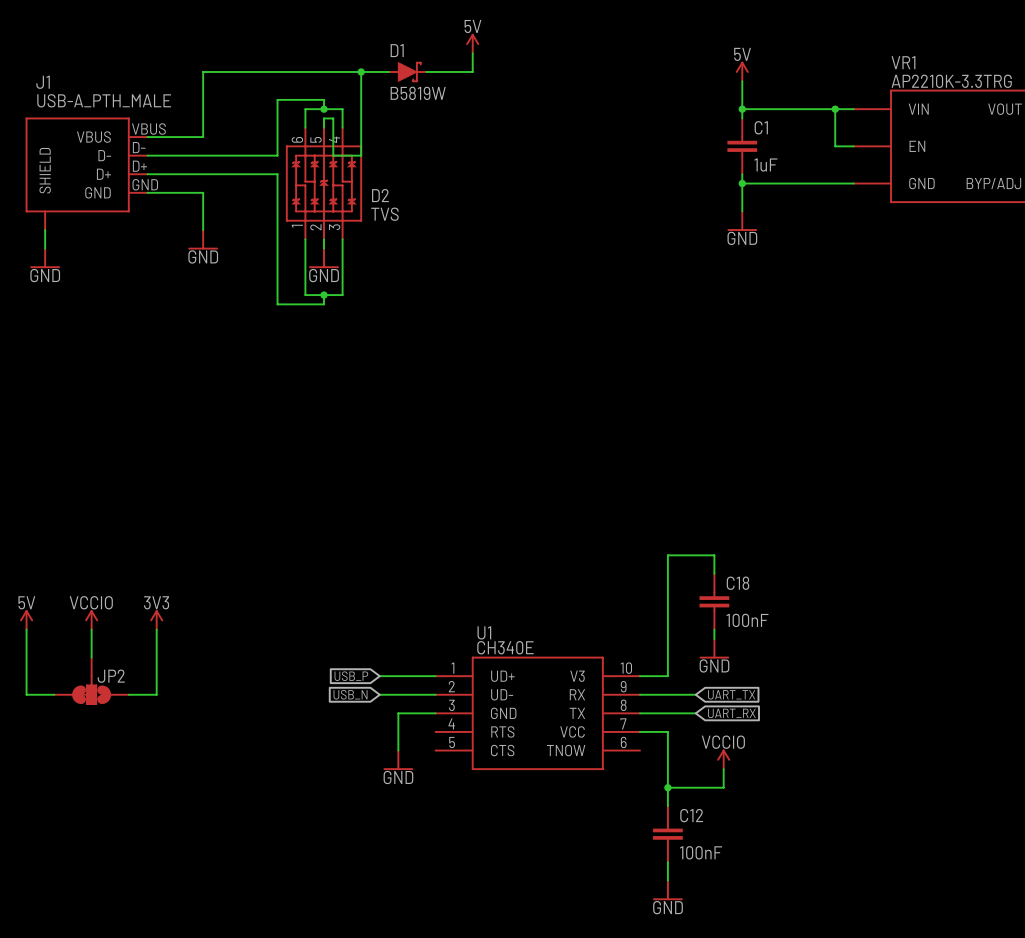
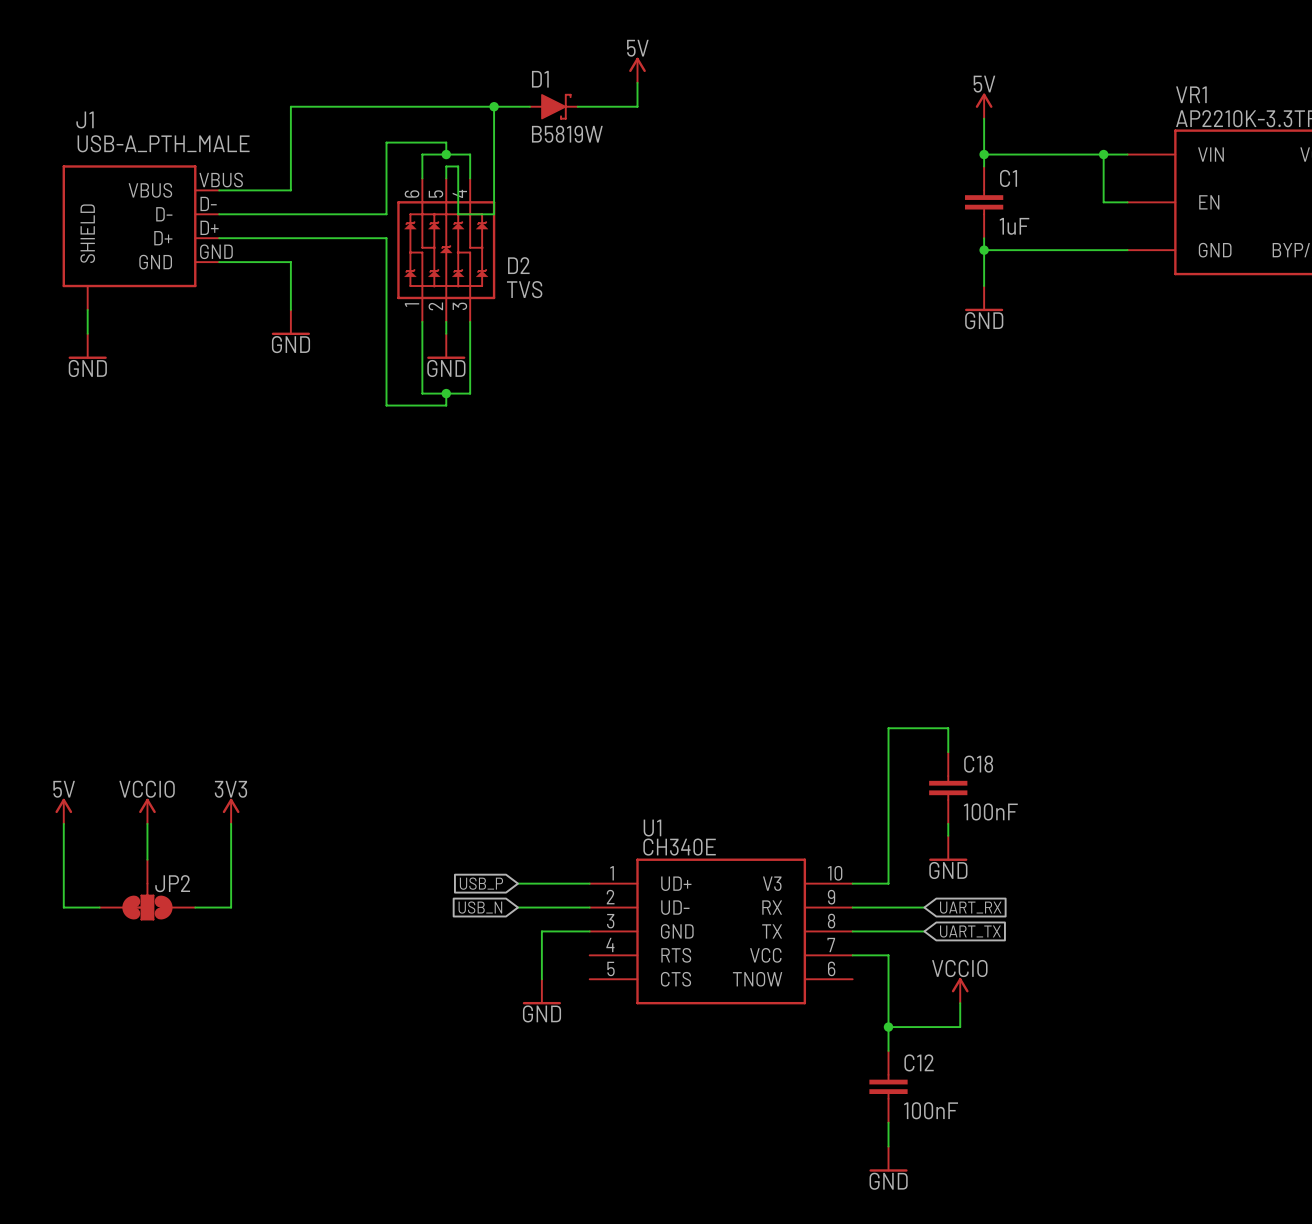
global label: UART_TX (731, 694) -> UART_RX (970, 907)
global label: UART_RX (731, 713) -> UART_TX (970, 931)

